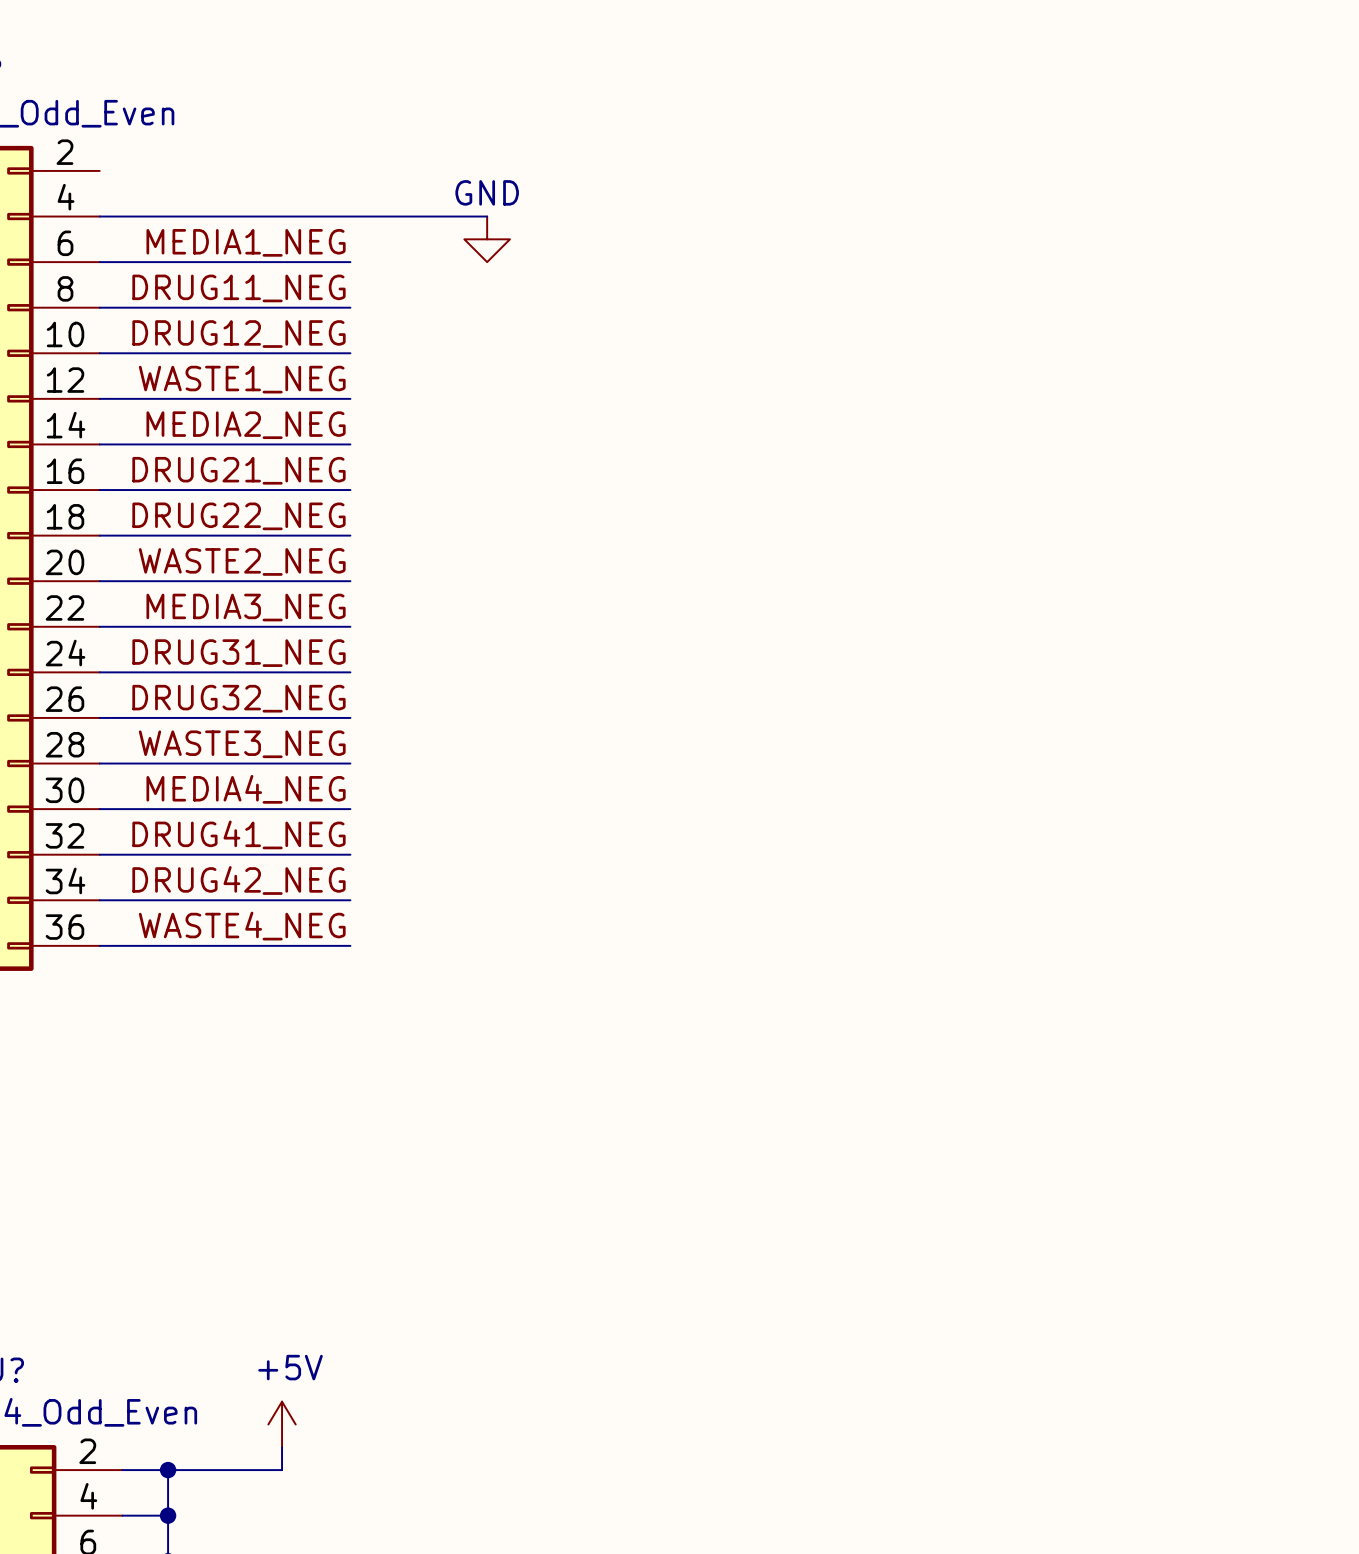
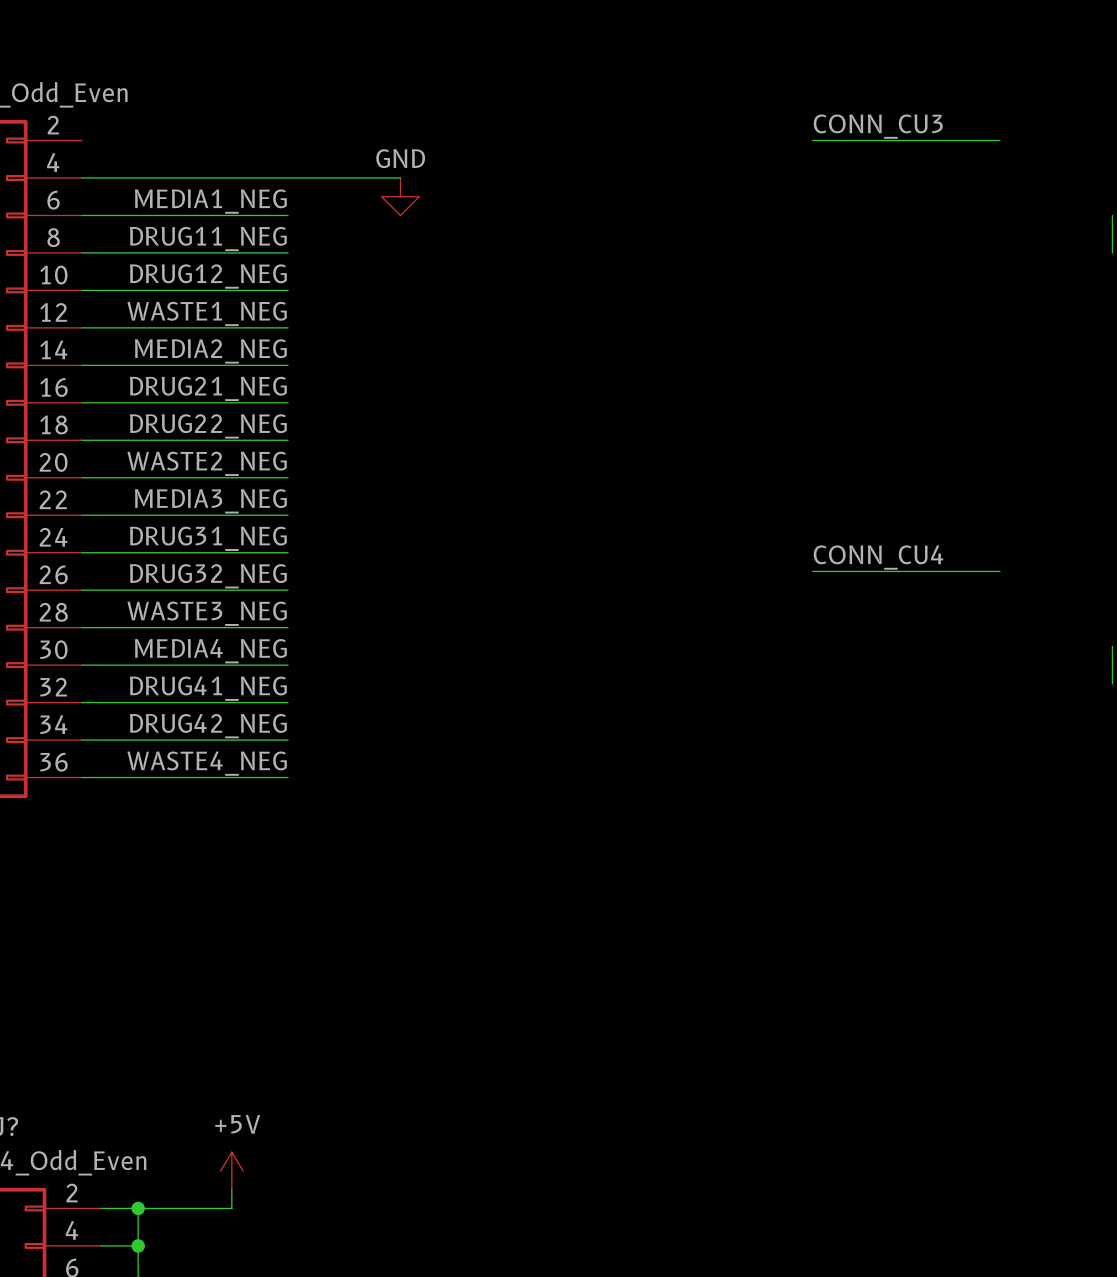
label: none -> CONN_CU3 (878, 126)
wire: none -> (812, 140) (1000, 140)
wire: none -> (1112, 215) (1112, 252)
label: none -> CONN_CU4 (878, 557)
wire: none -> (812, 571) (1000, 571)
wire: none -> (1112, 646) (1112, 683)

